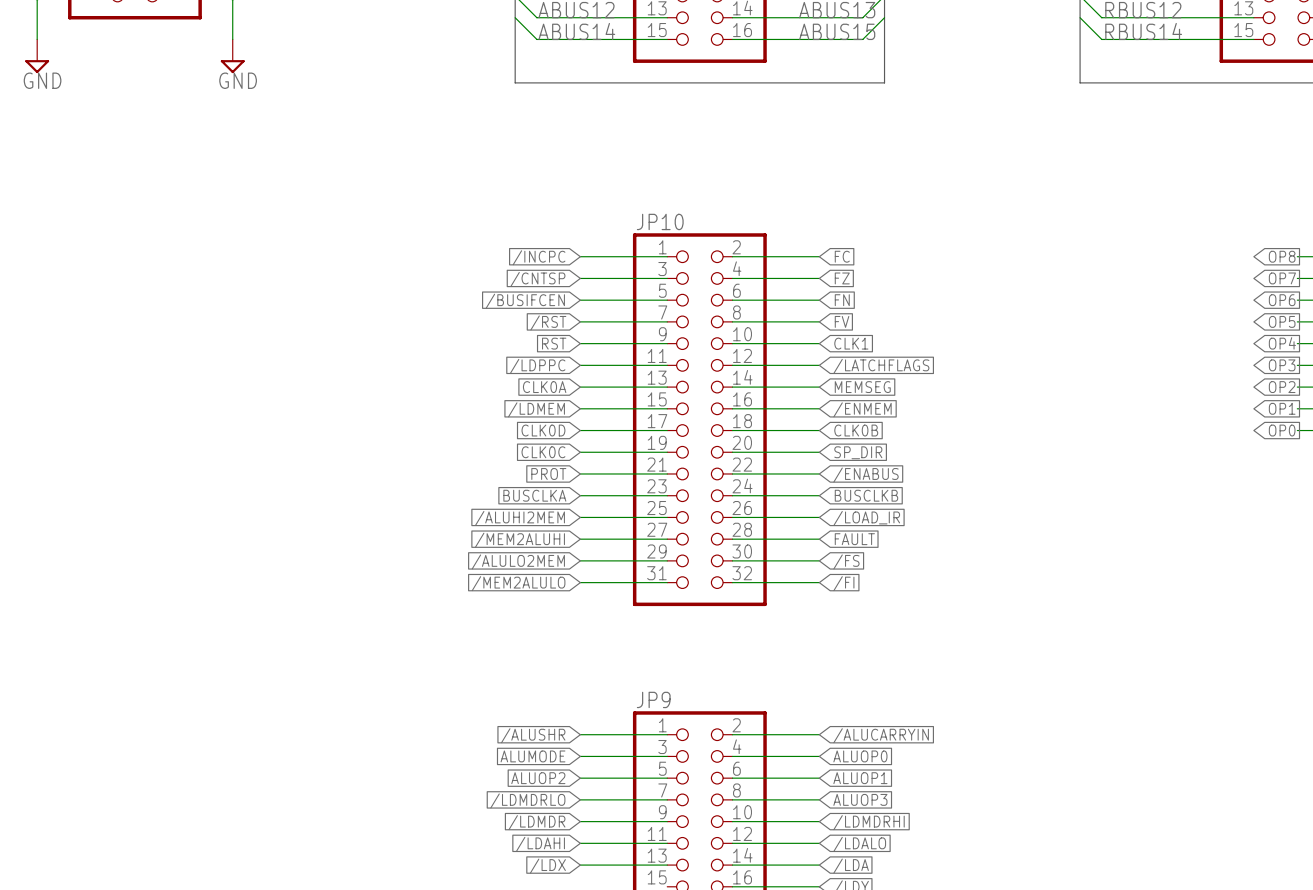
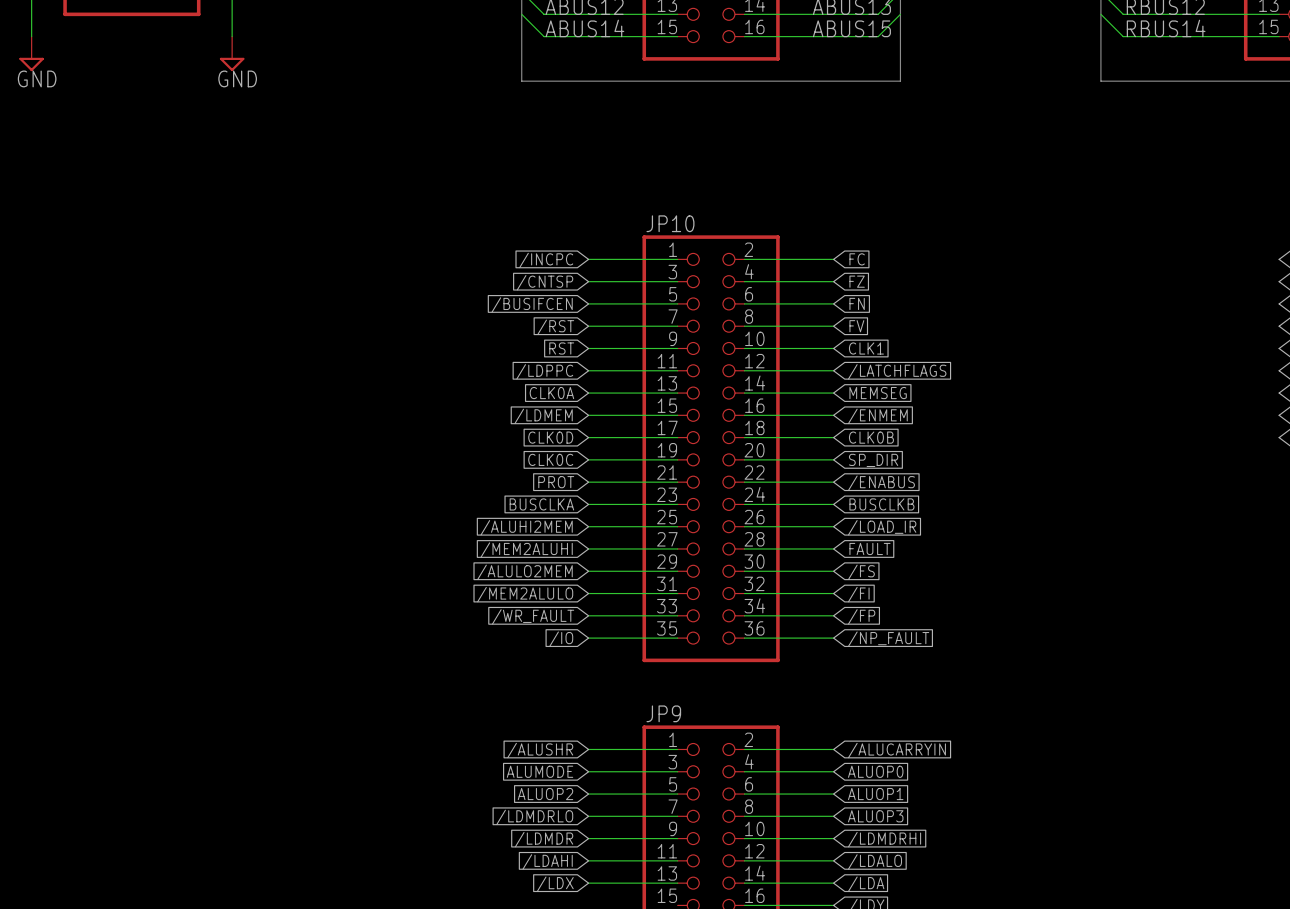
JP10 symbol: [632, 233, 767, 607] -> [642, 235, 780, 663]
wire: none -> (588, 615) (677, 615)
wire: none -> (744, 615) (833, 615)
global label: none -> /WR_FAULT (533, 616)
global label: none -> /FP (861, 616)
wire: none -> (588, 638) (677, 638)
wire: none -> (744, 638) (833, 638)
global label: none -> /IO (561, 639)
global label: none -> /NP_FAULT (888, 639)

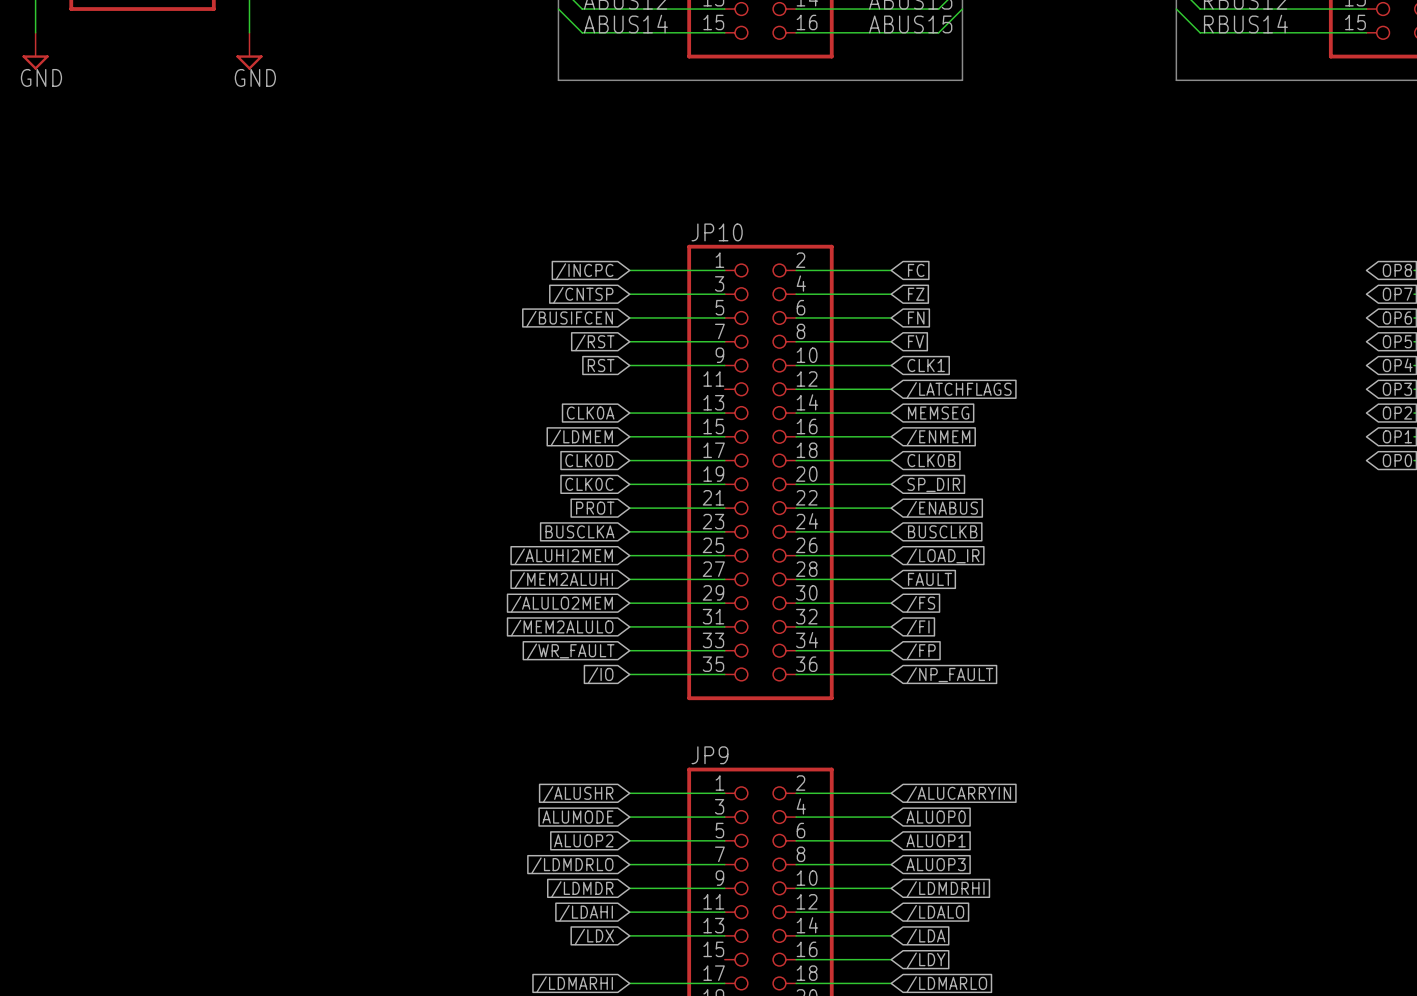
wire: (588, 370) (677, 370) -> none
global label: /LDPPC (544, 371) -> none

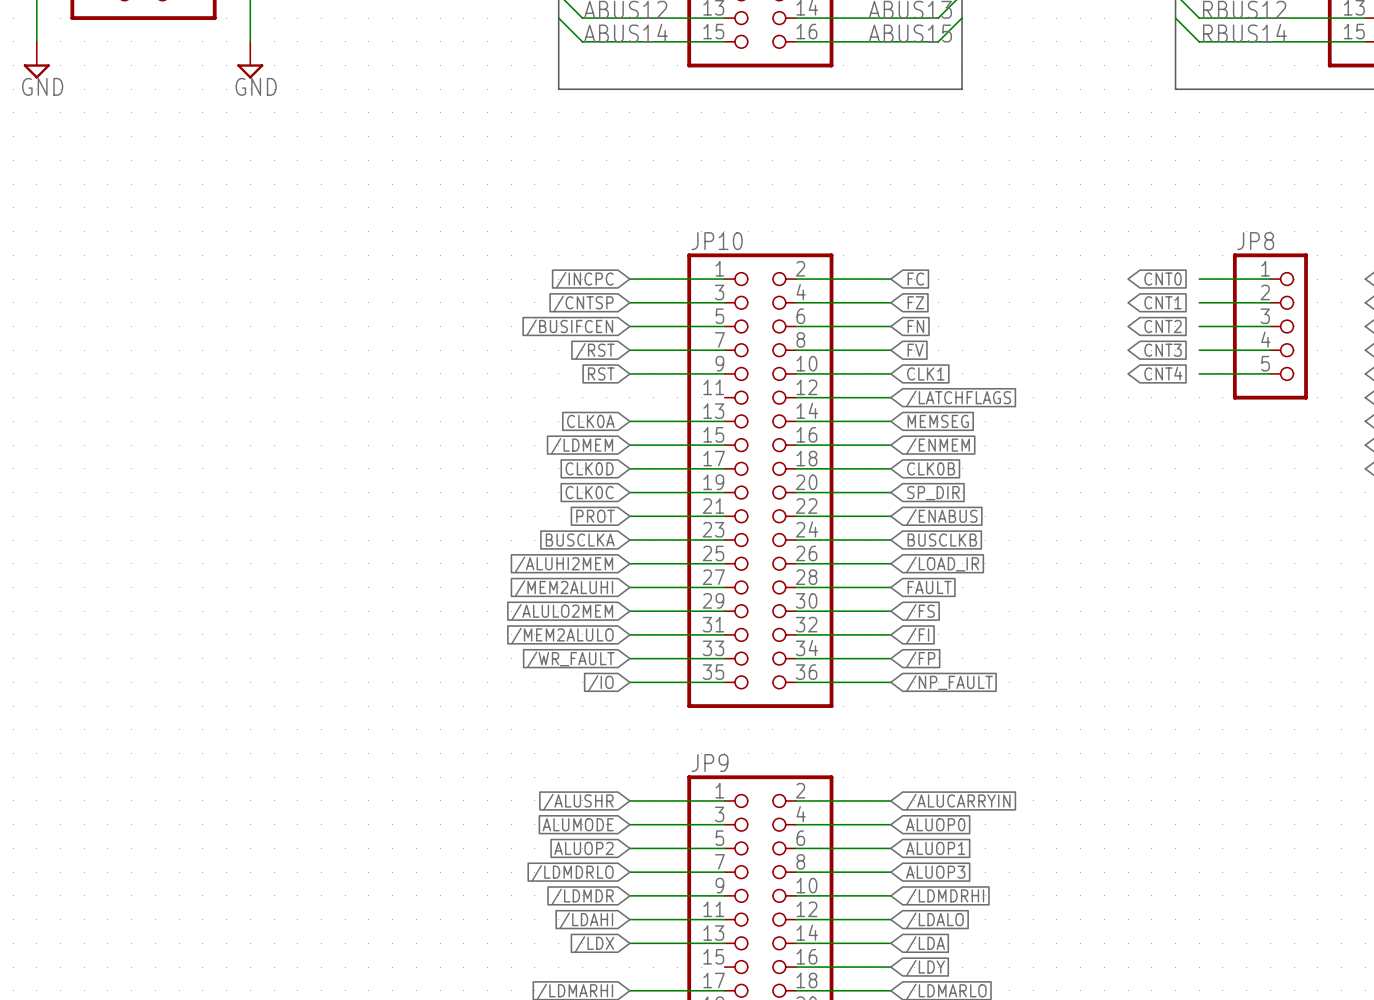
global label: none -> CNT0 (1163, 279)
wire: none -> (1199, 279) (1270, 279)
global label: none -> CNT1 (1163, 302)
wire: none -> (1199, 302) (1270, 302)
global label: none -> CNT2 (1163, 326)
wire: none -> (1199, 326) (1270, 326)
JP8: none -> (1270, 326)
global label: none -> CNT3 (1163, 350)
wire: none -> (1199, 350) (1270, 350)
global label: none -> CNT4 (1163, 373)
wire: none -> (1199, 373) (1270, 373)

